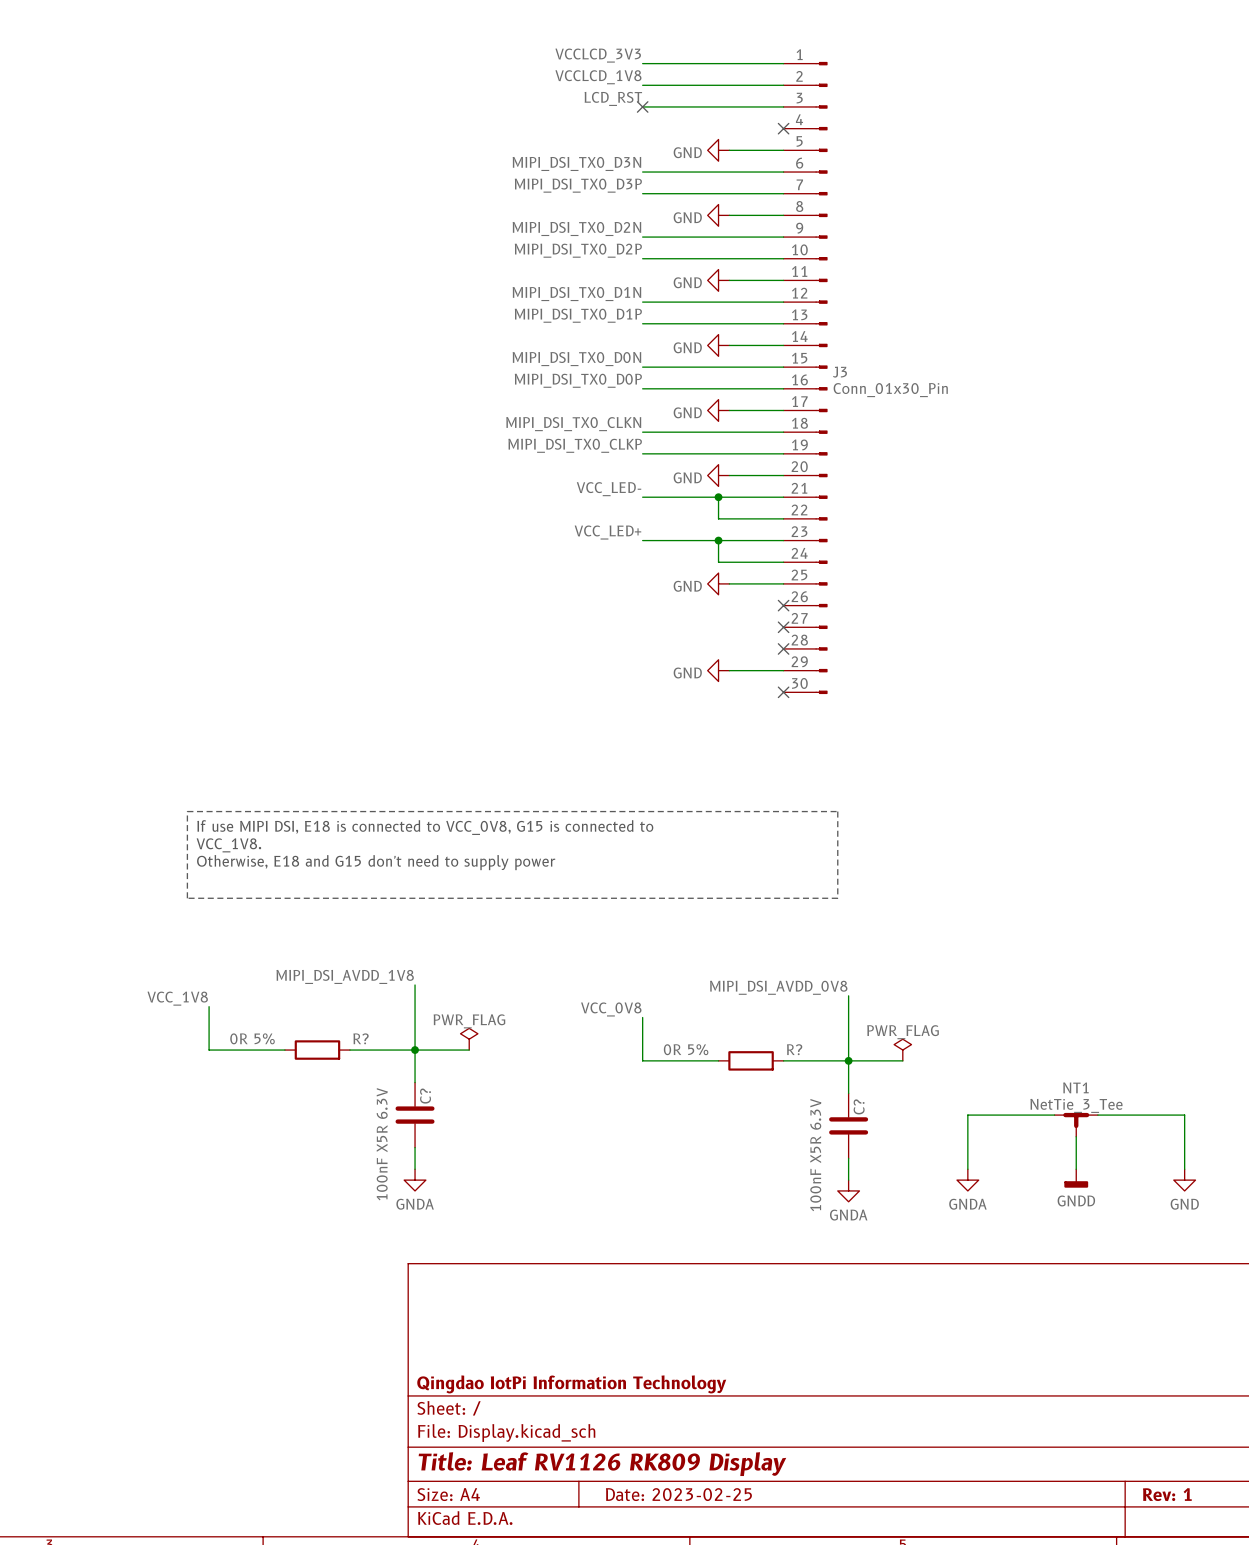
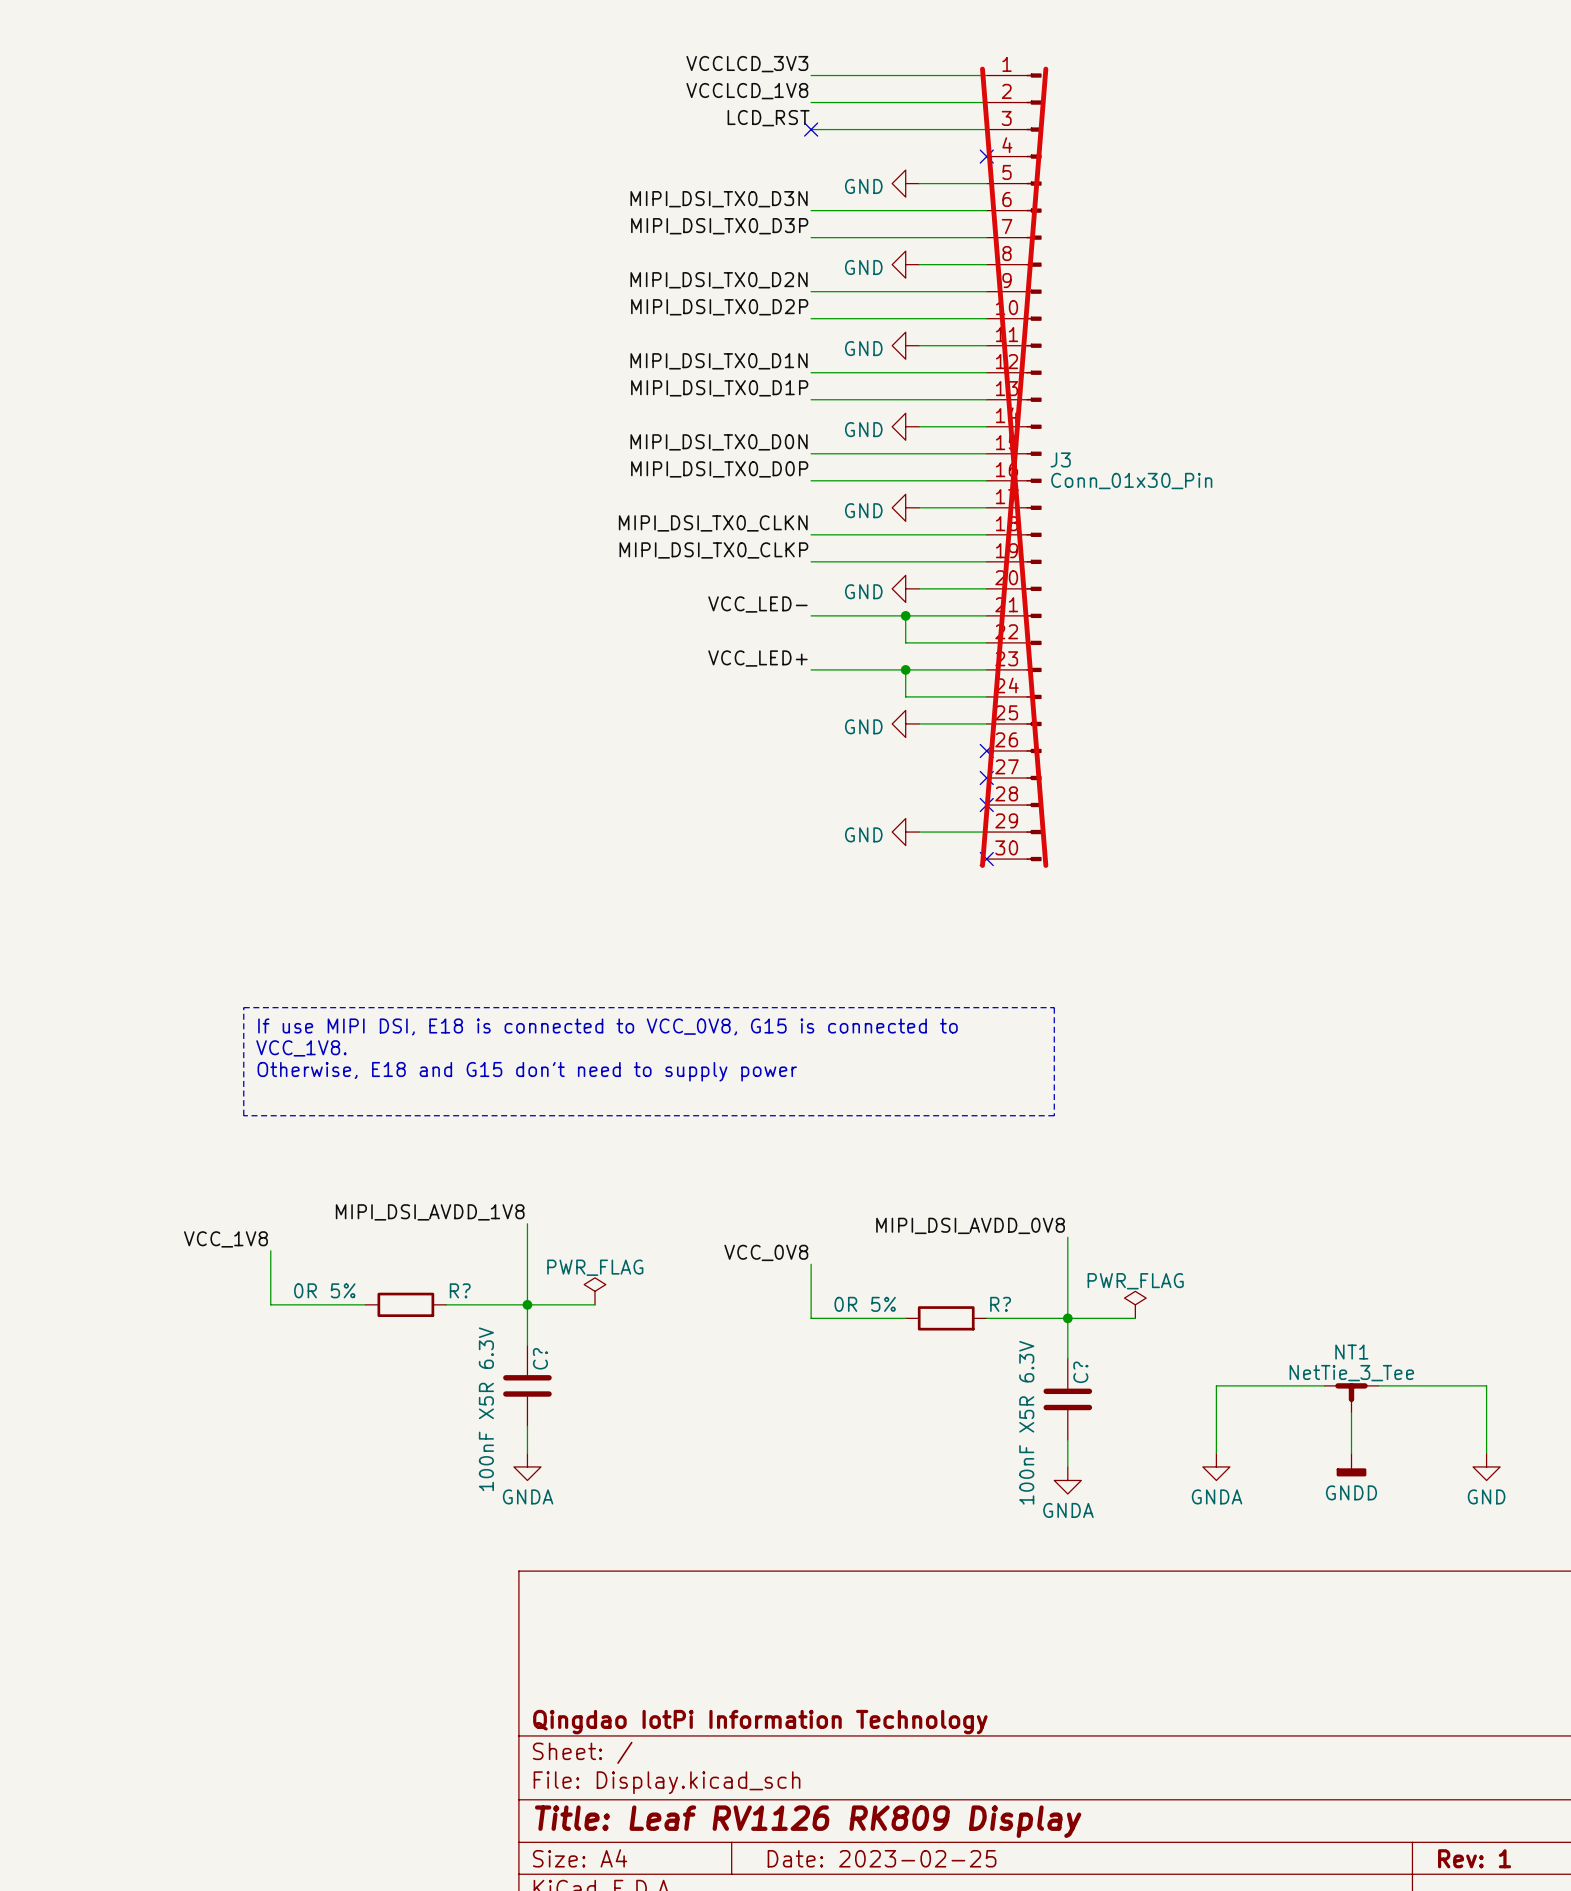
J3 do-not-place cross: none -> (1014, 467)

